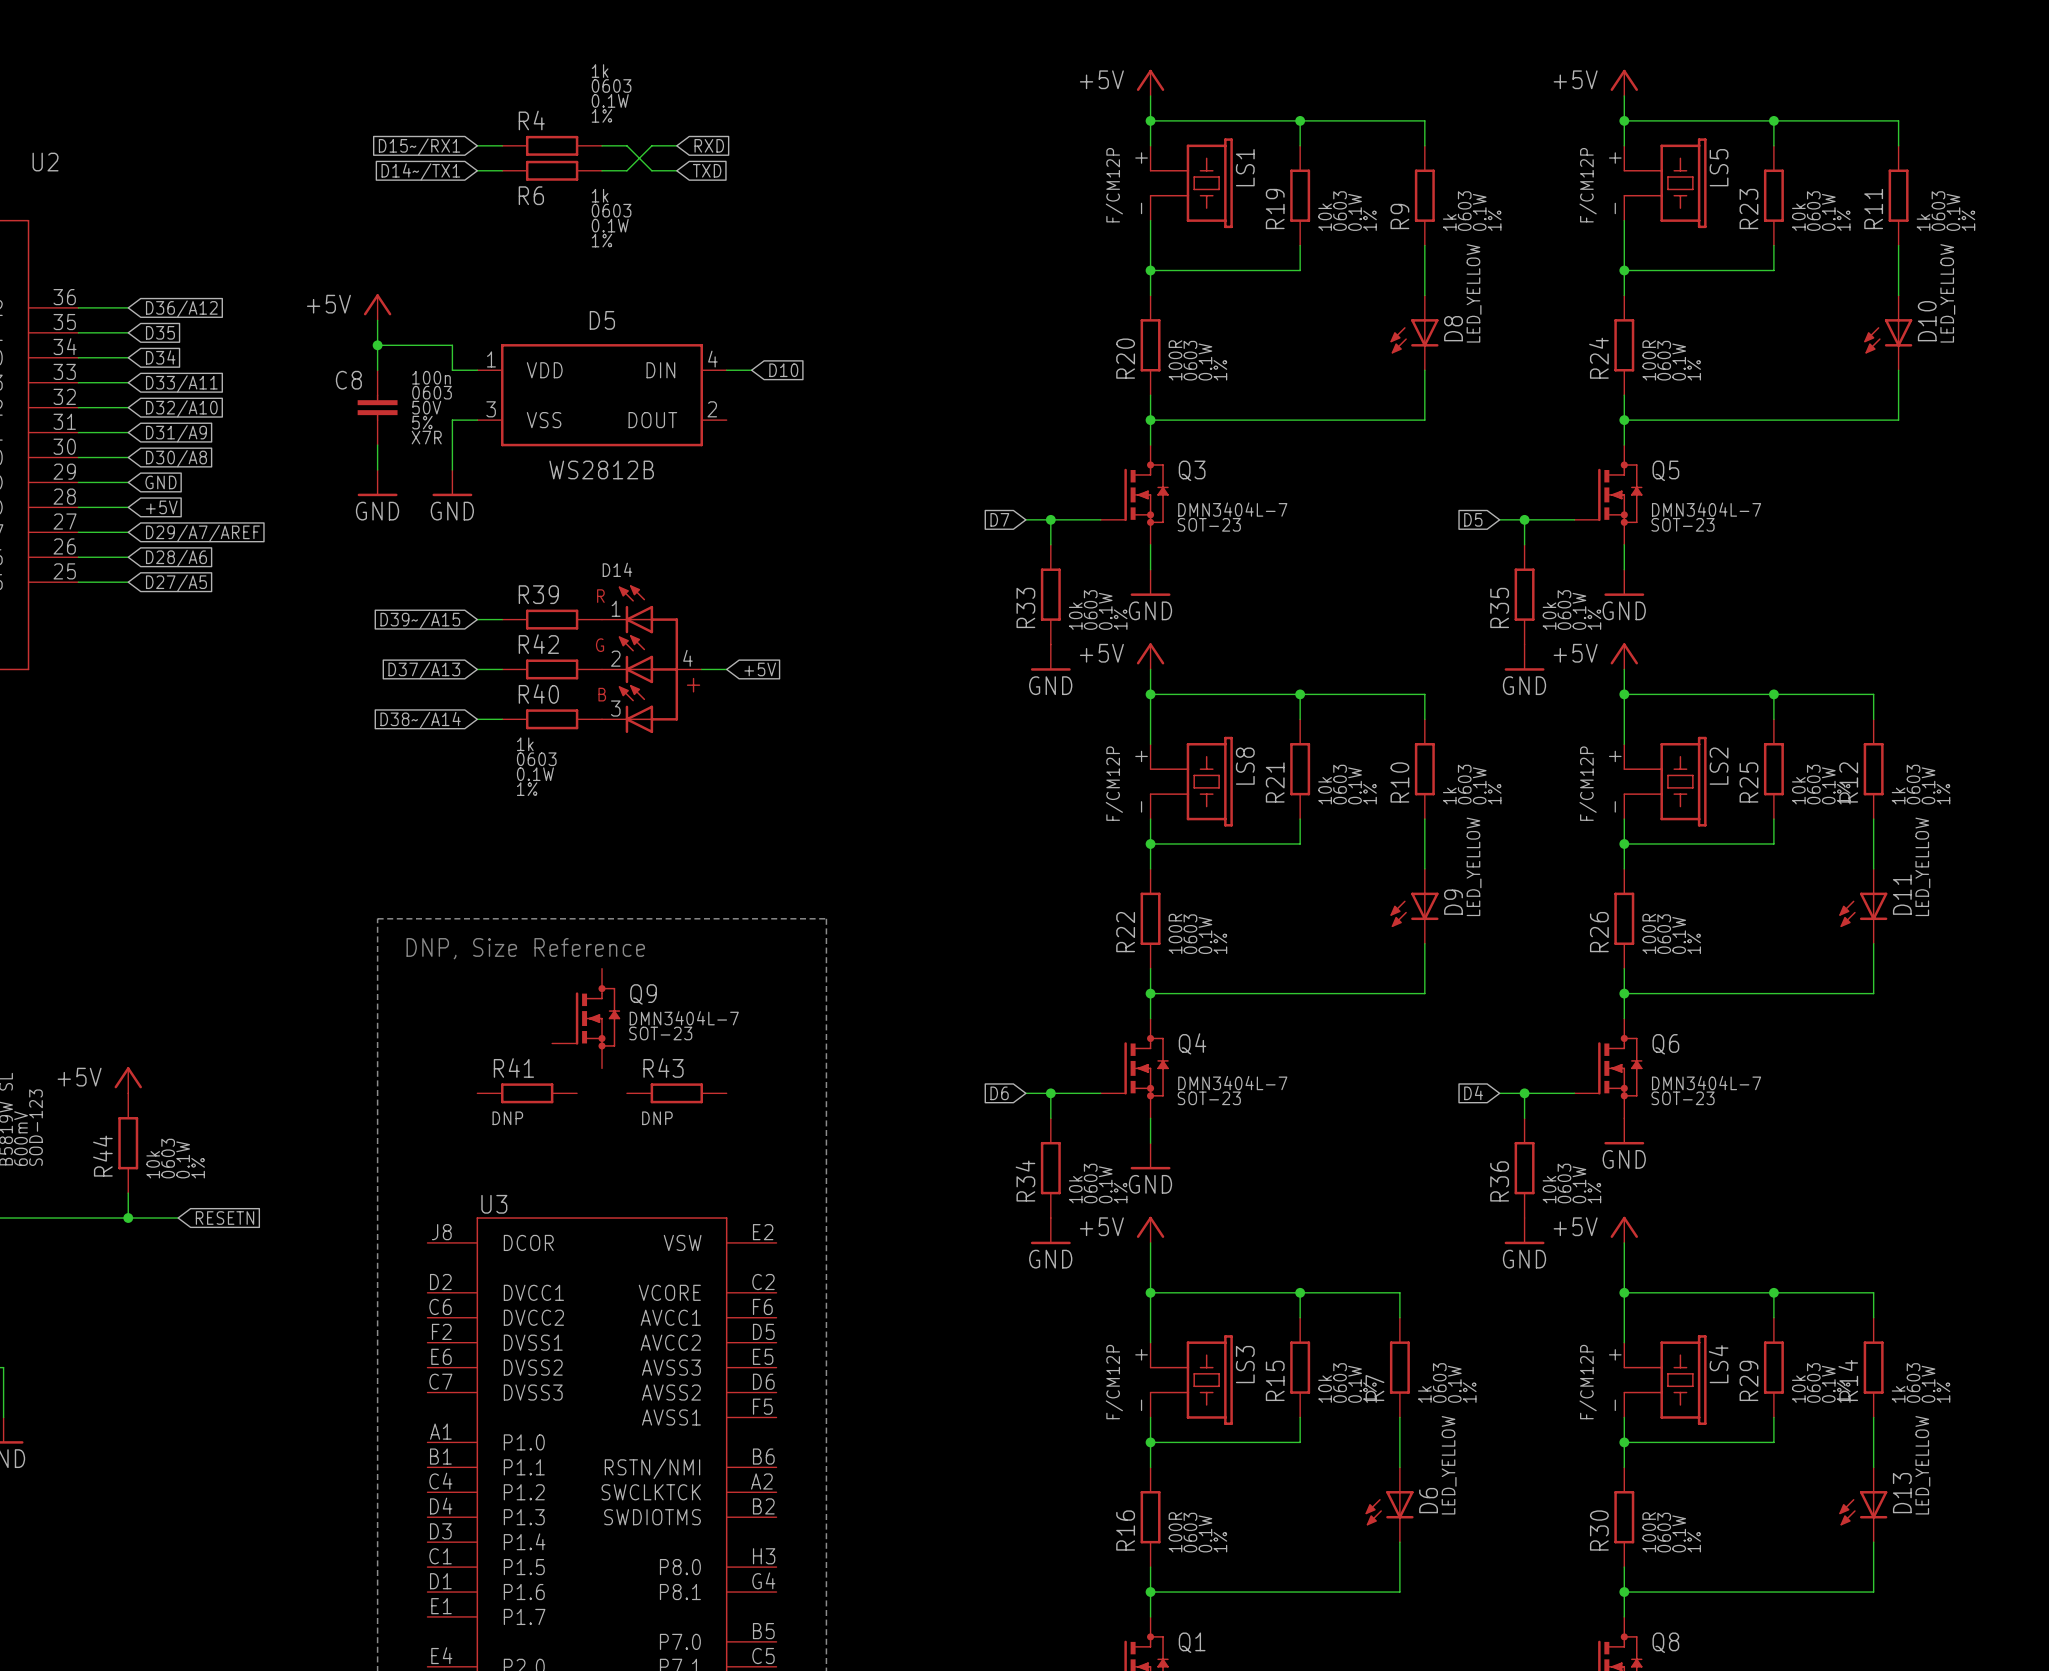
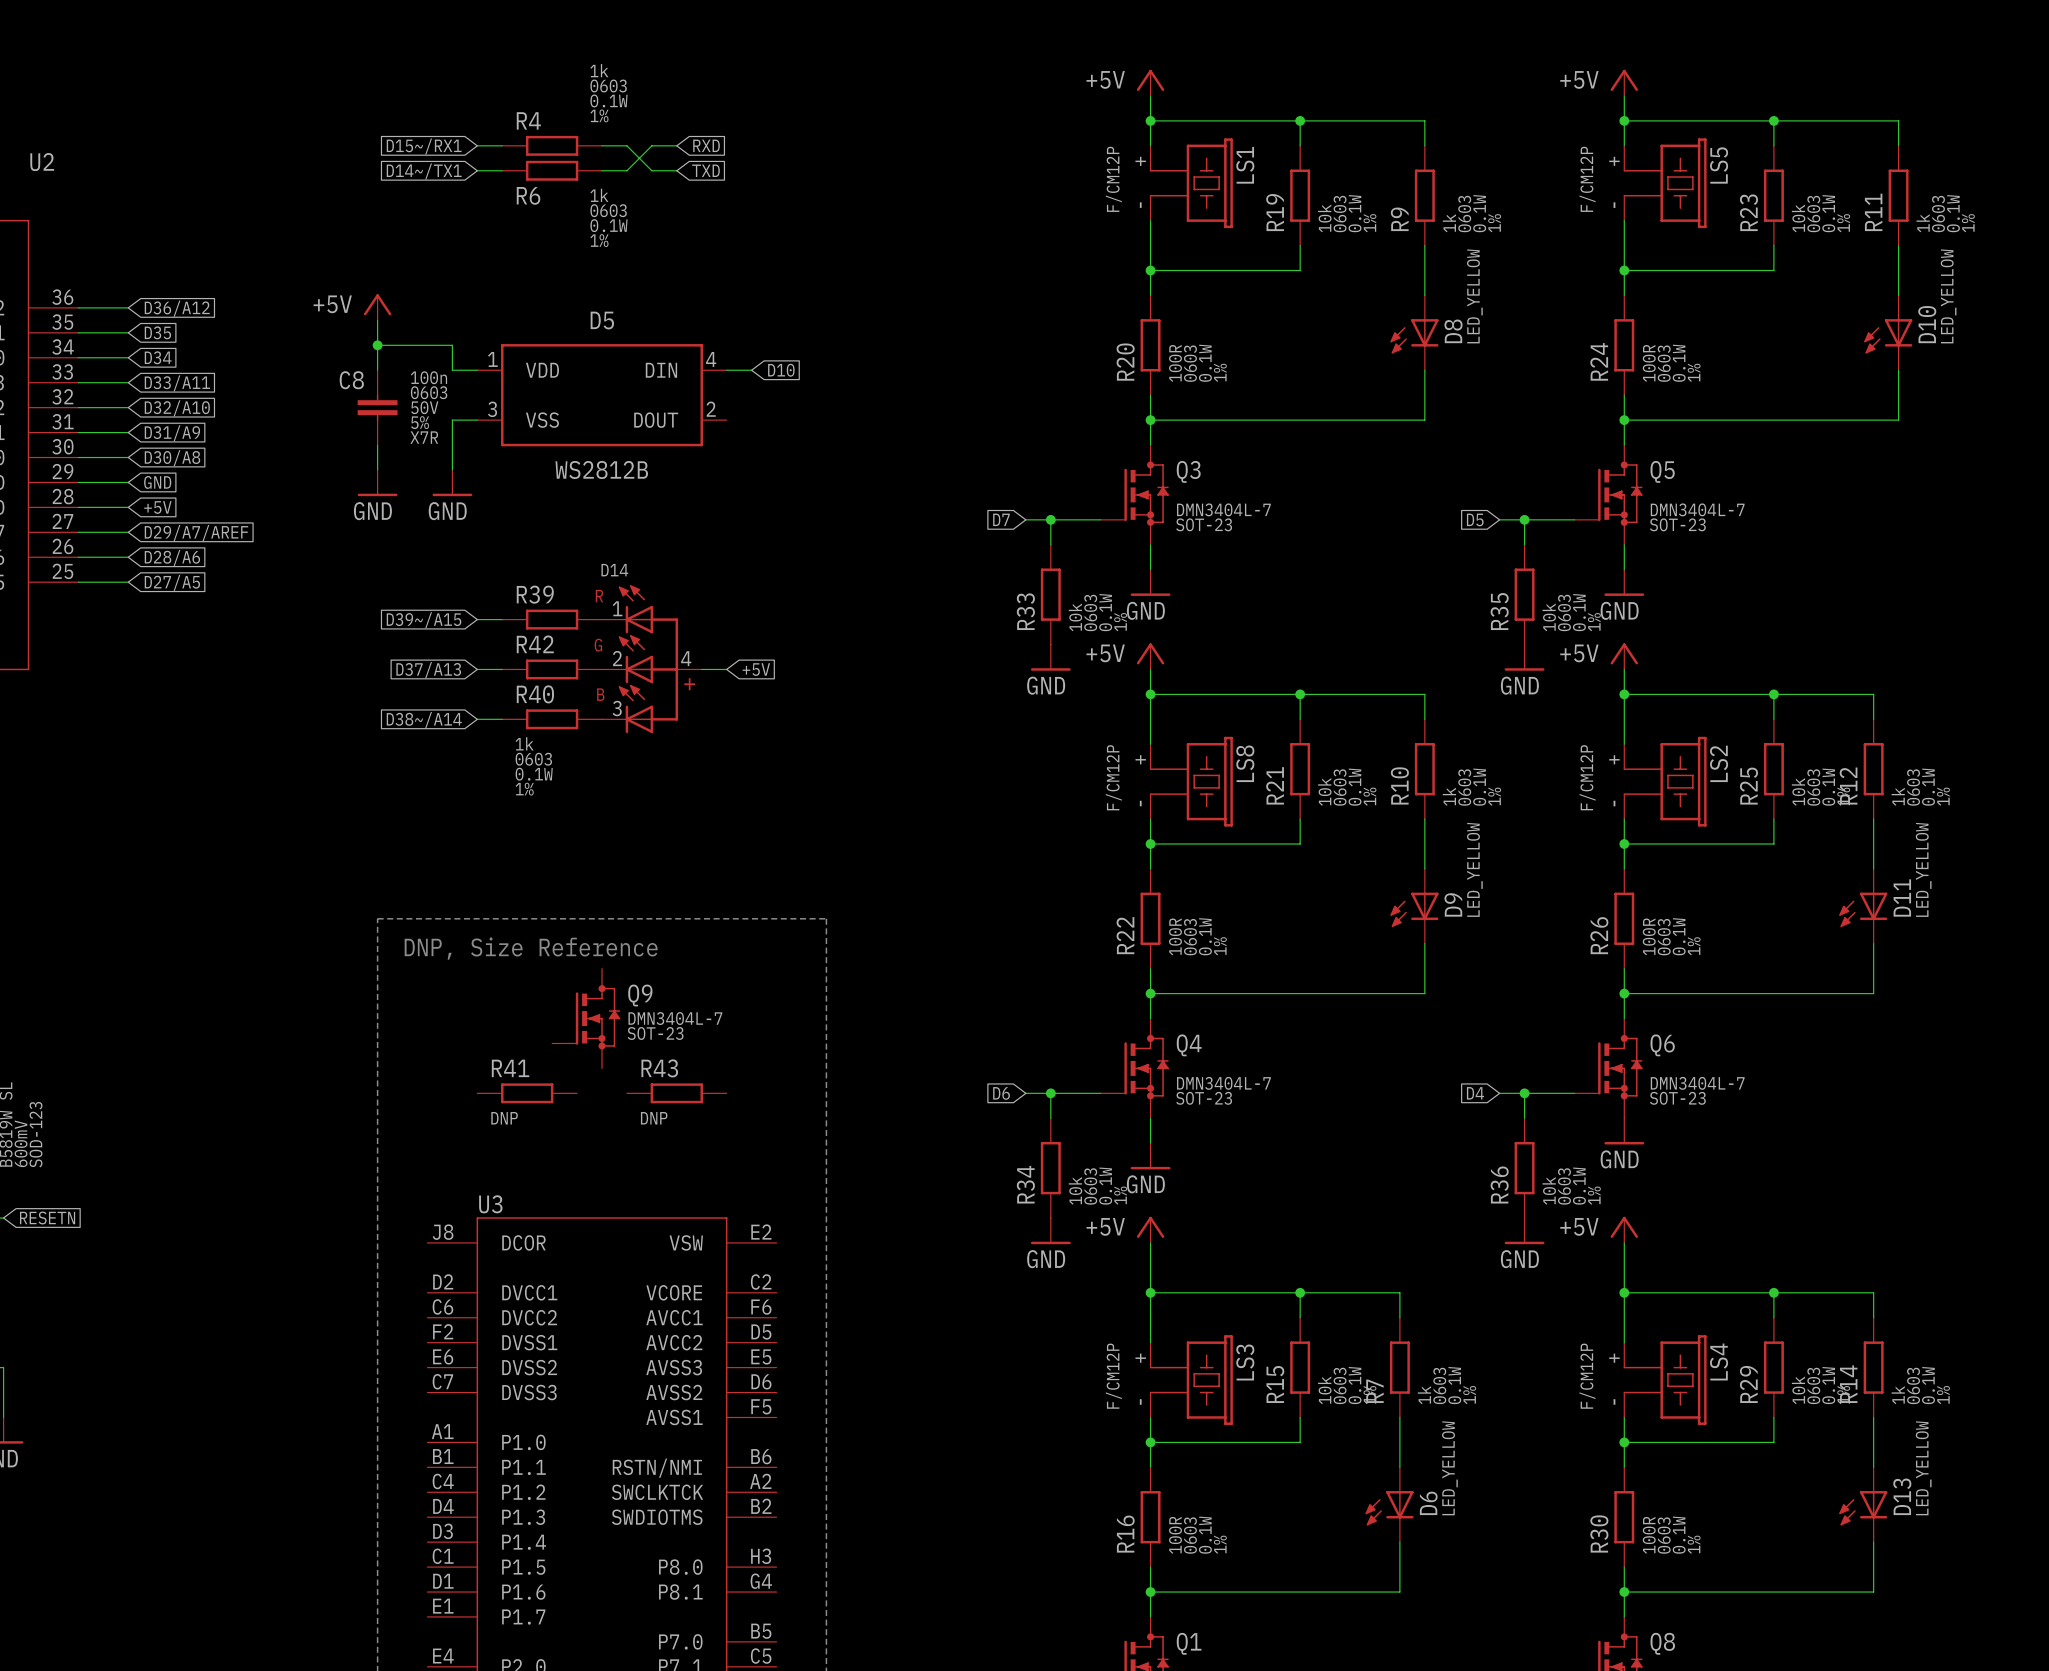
power symbol: +5V (128, 1080) -> none
R44: 10k (128, 1143) -> none
wire: (128, 1193) (128, 1218) -> none
wire: (3, 1218) (178, 1218) -> none
junction: (128, 1218) -> none
global label position: RESETN (225, 1218) -> RESETN (47, 1218)

